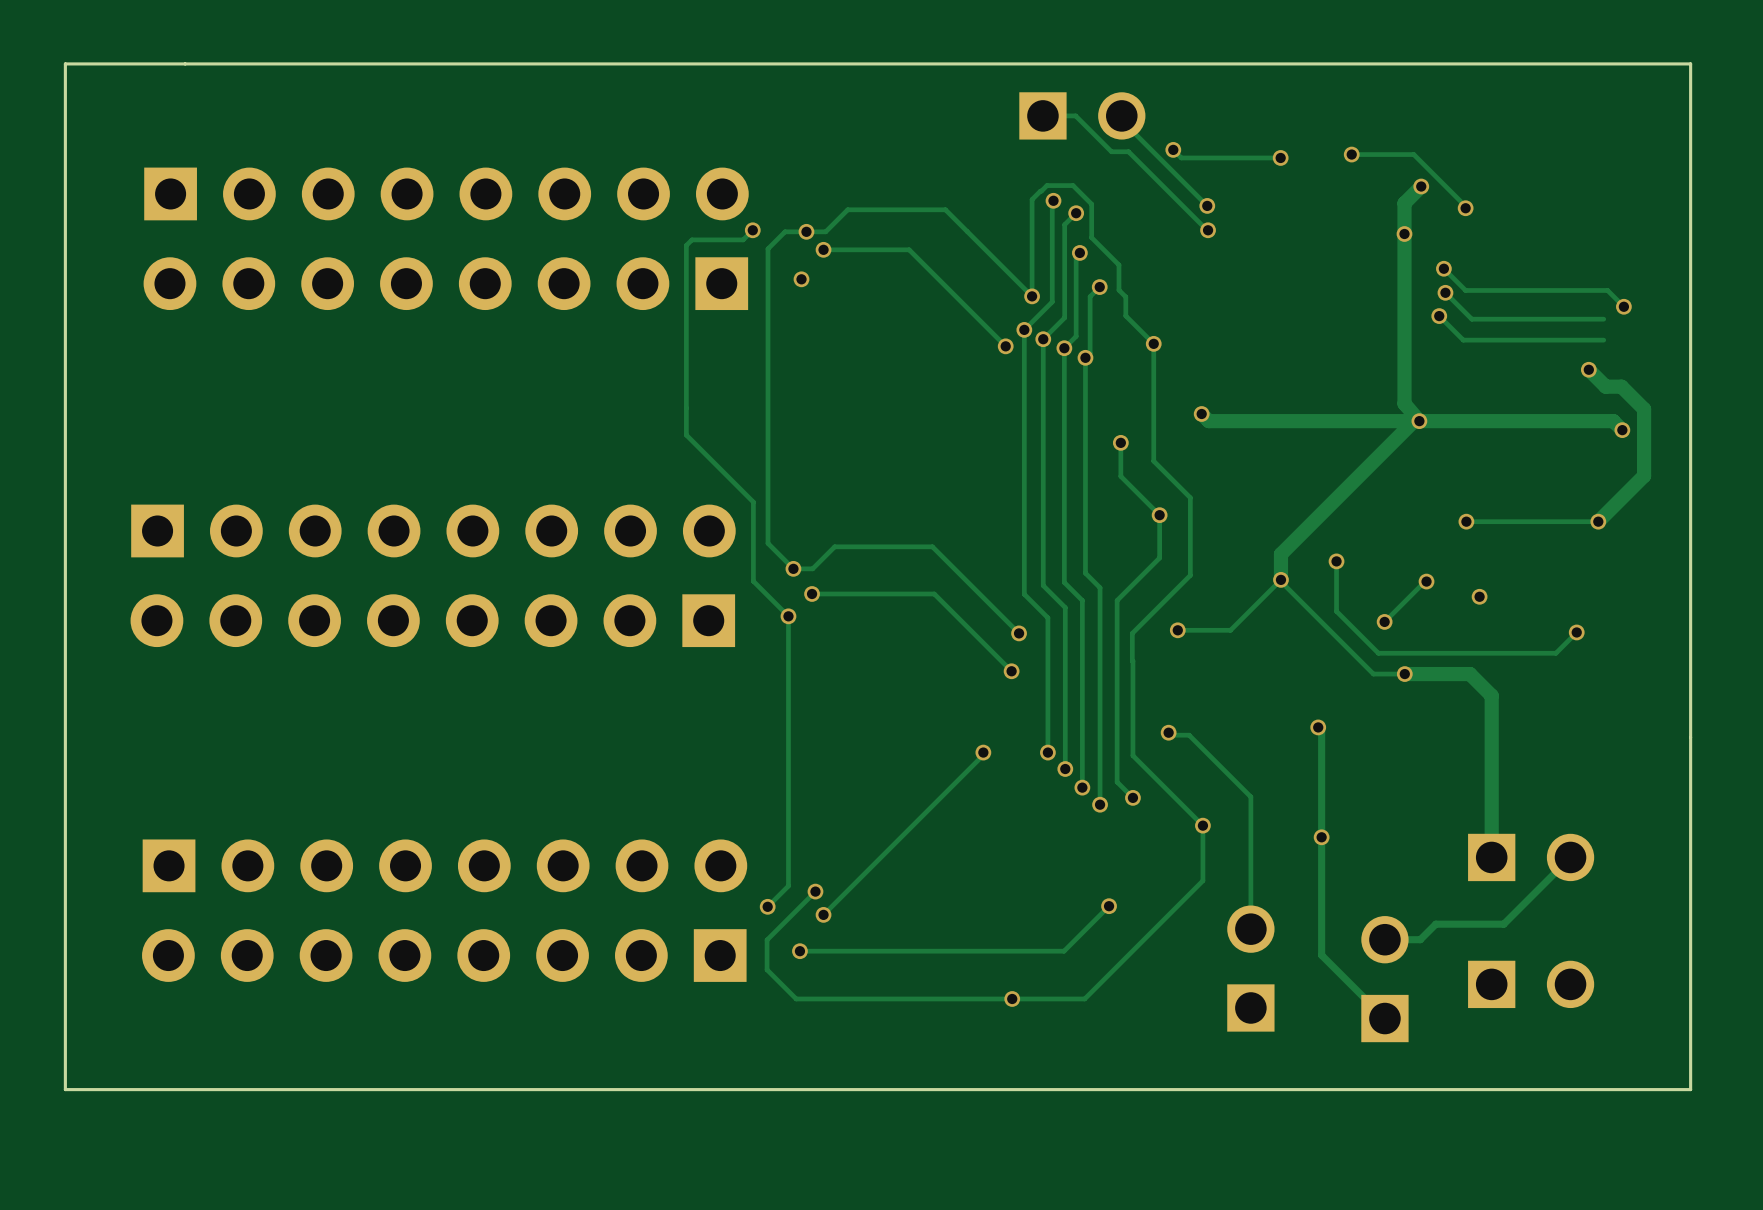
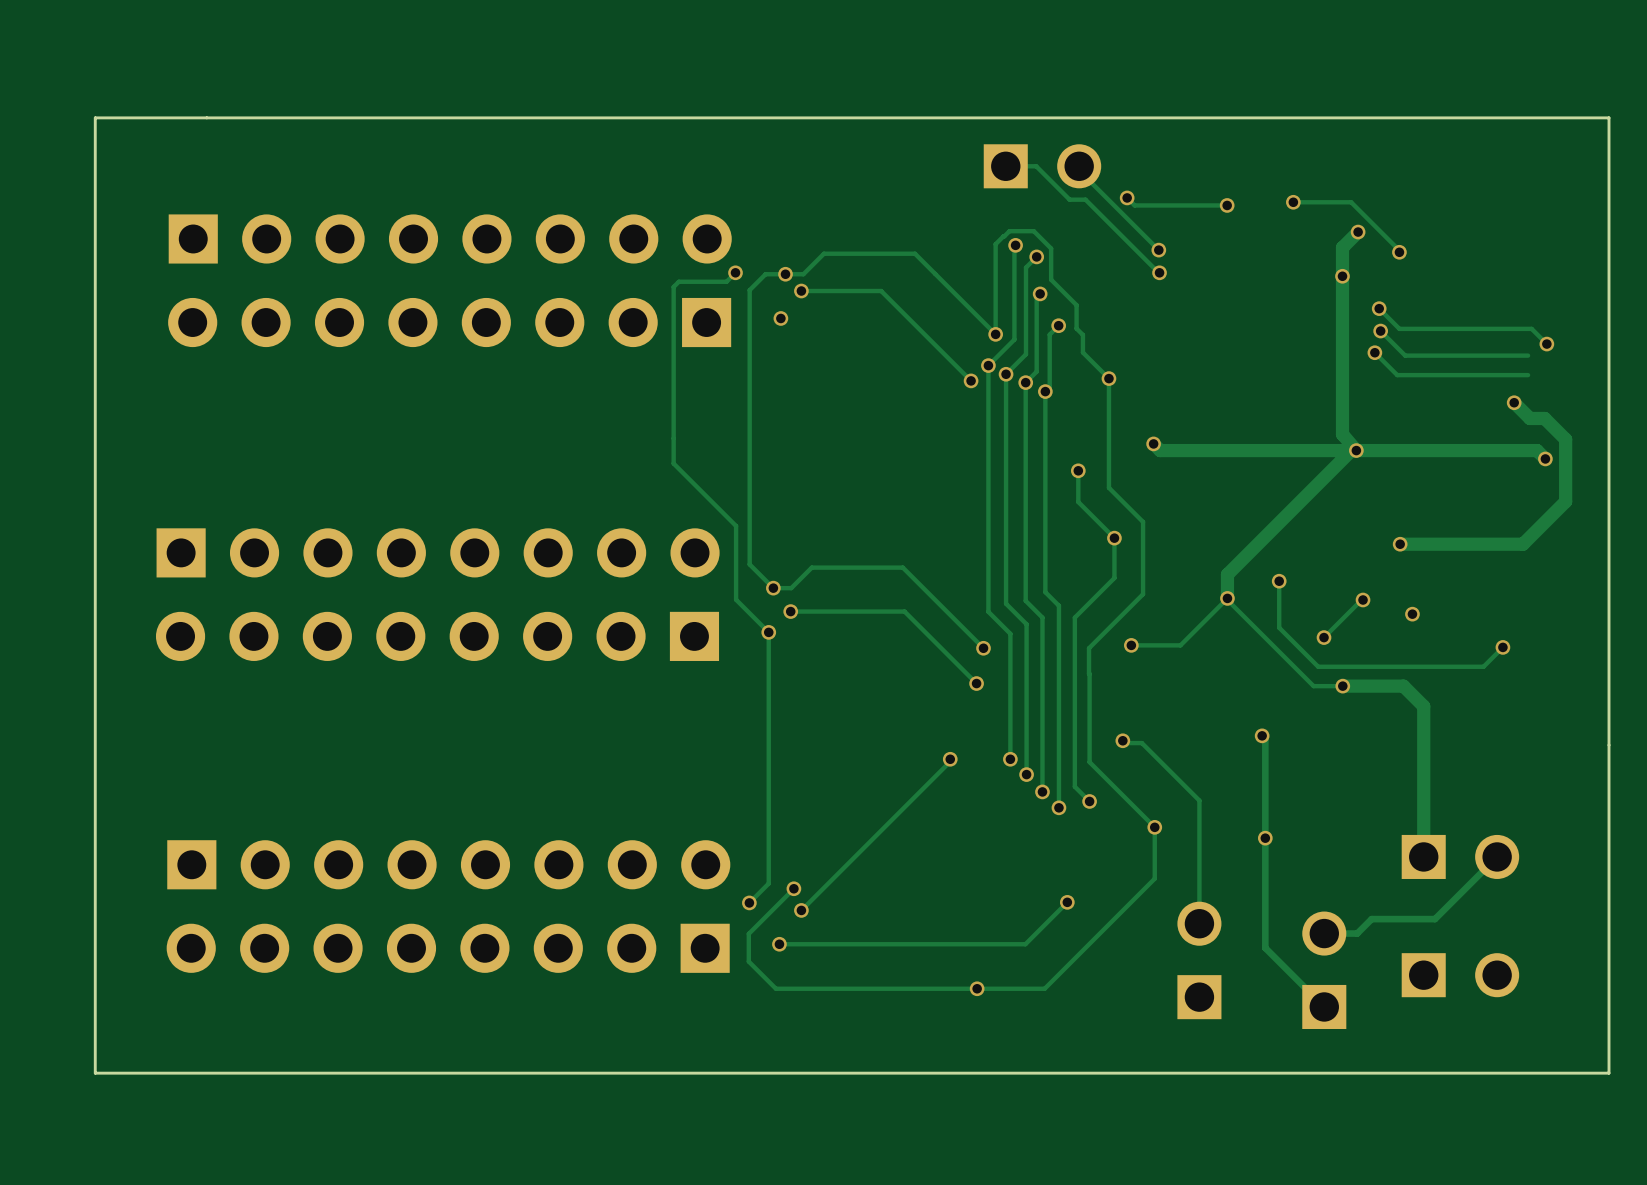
track width: thin (1598, 521) (1466, 521) -> thick (1523, 544) (1400, 544)
via: (1598, 521) -> none

